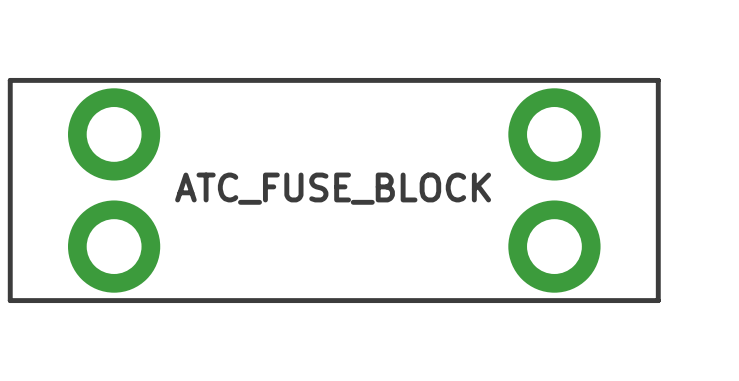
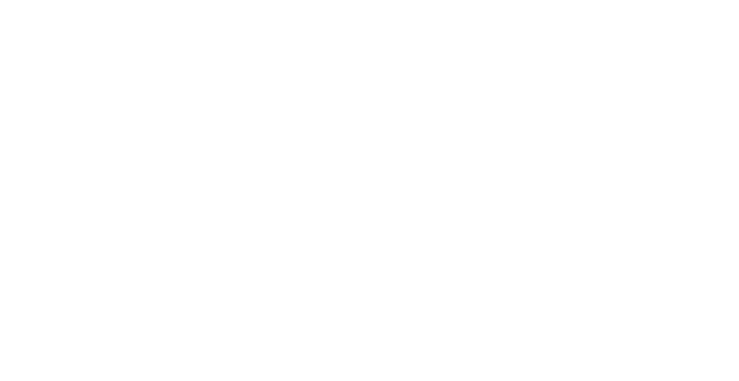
part: ATC_FUSE_BLOCK (334, 190) -> none

